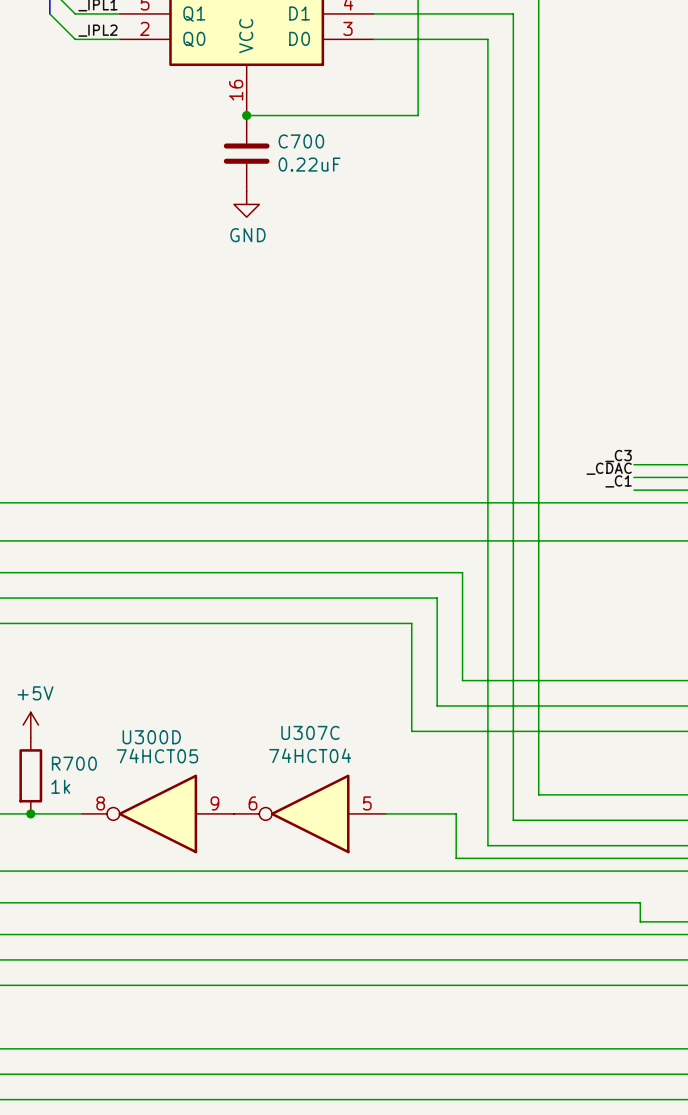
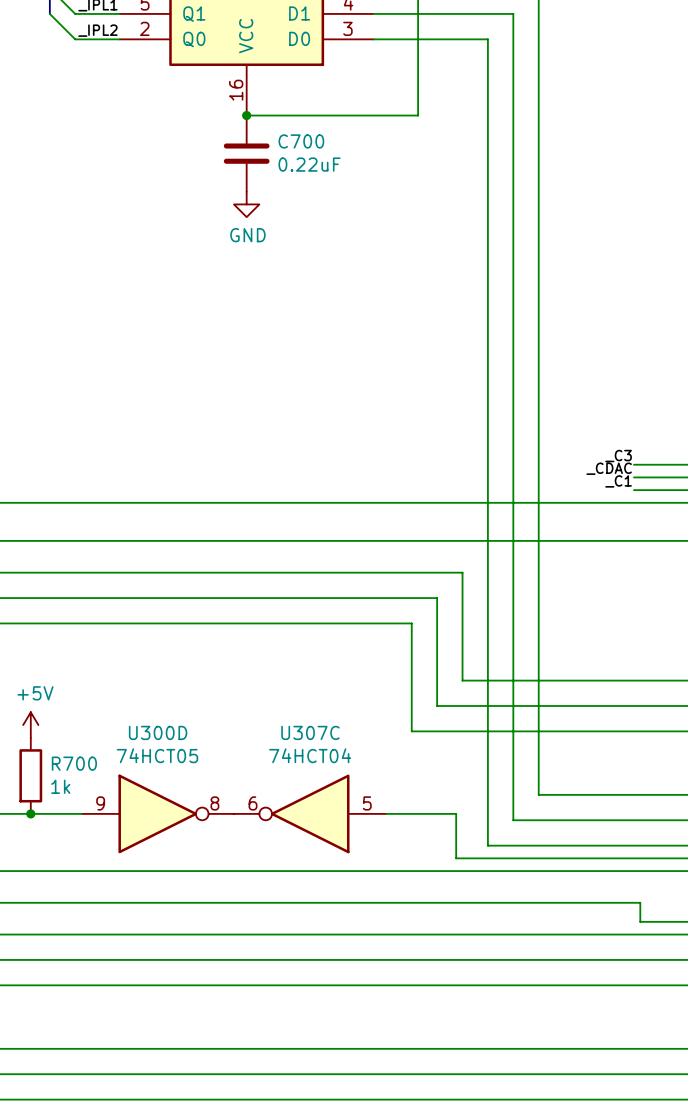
U300D rotation: 0° (157, 813) -> 180° (157, 813)

